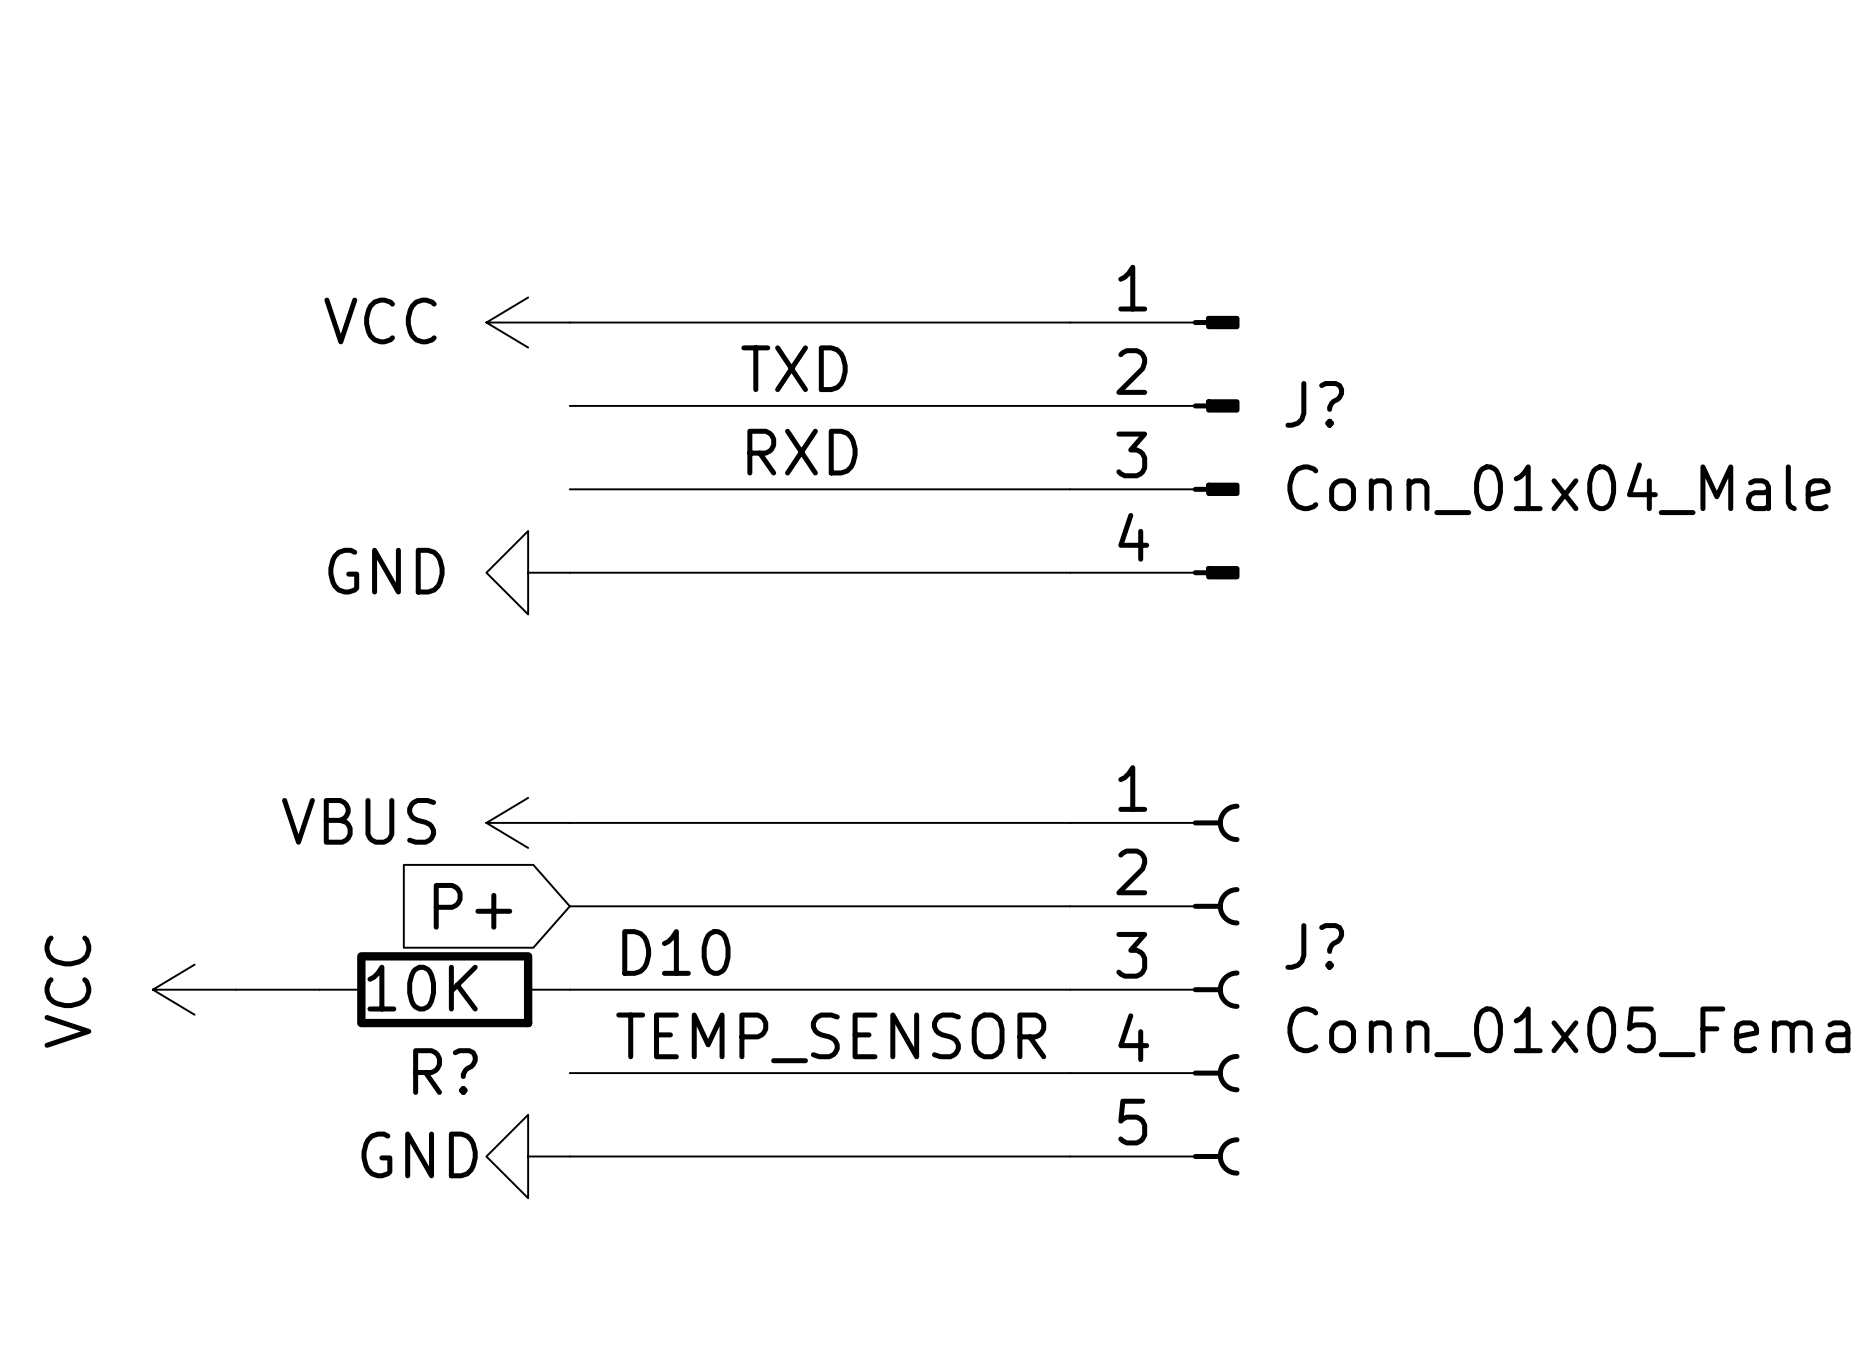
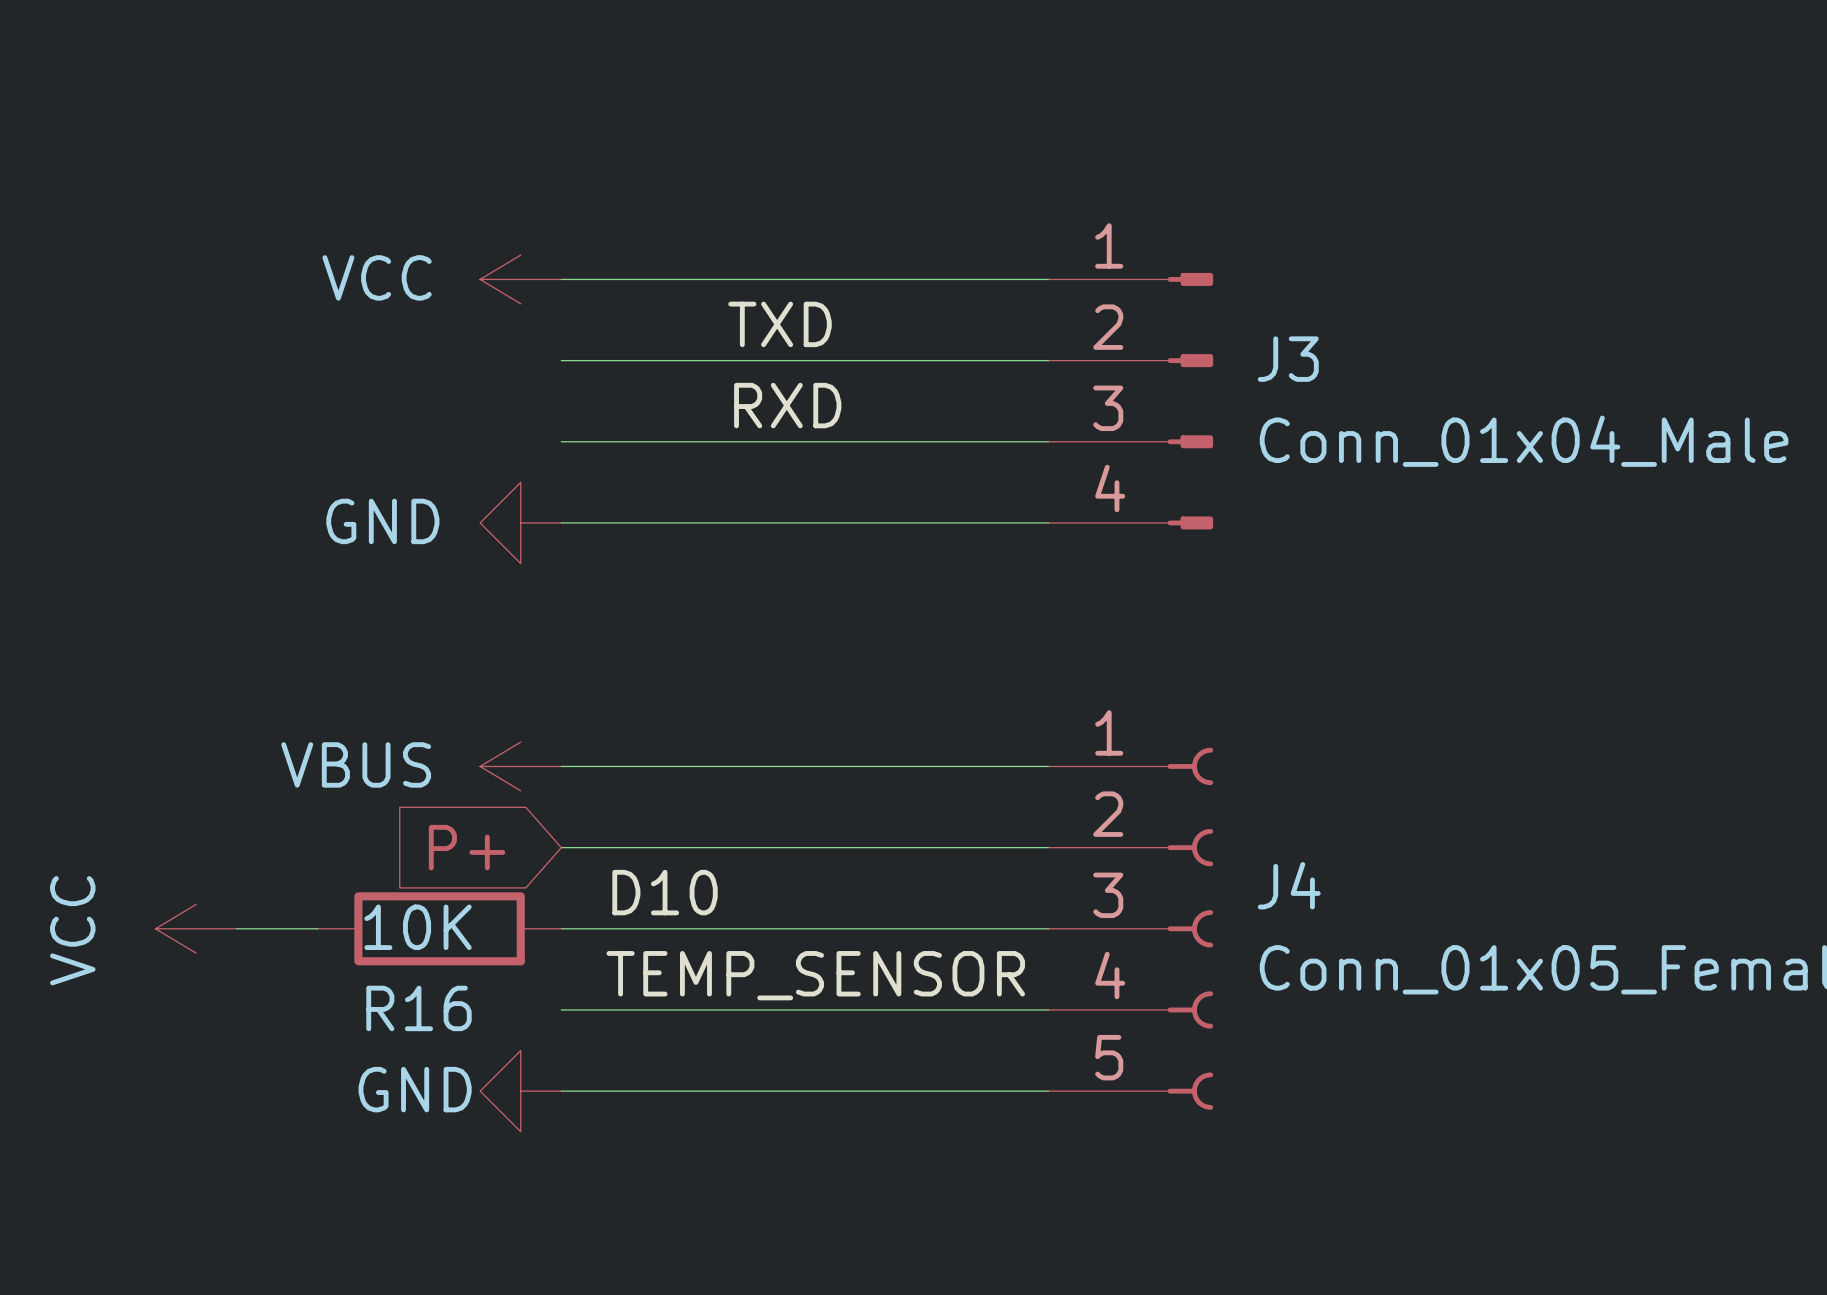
J? name: J? (1314, 404) -> J3 (1288, 359)
J? name: J? (1314, 946) -> J4 (1289, 885)
R? name: R? (445, 1071) -> R16 (418, 1008)

